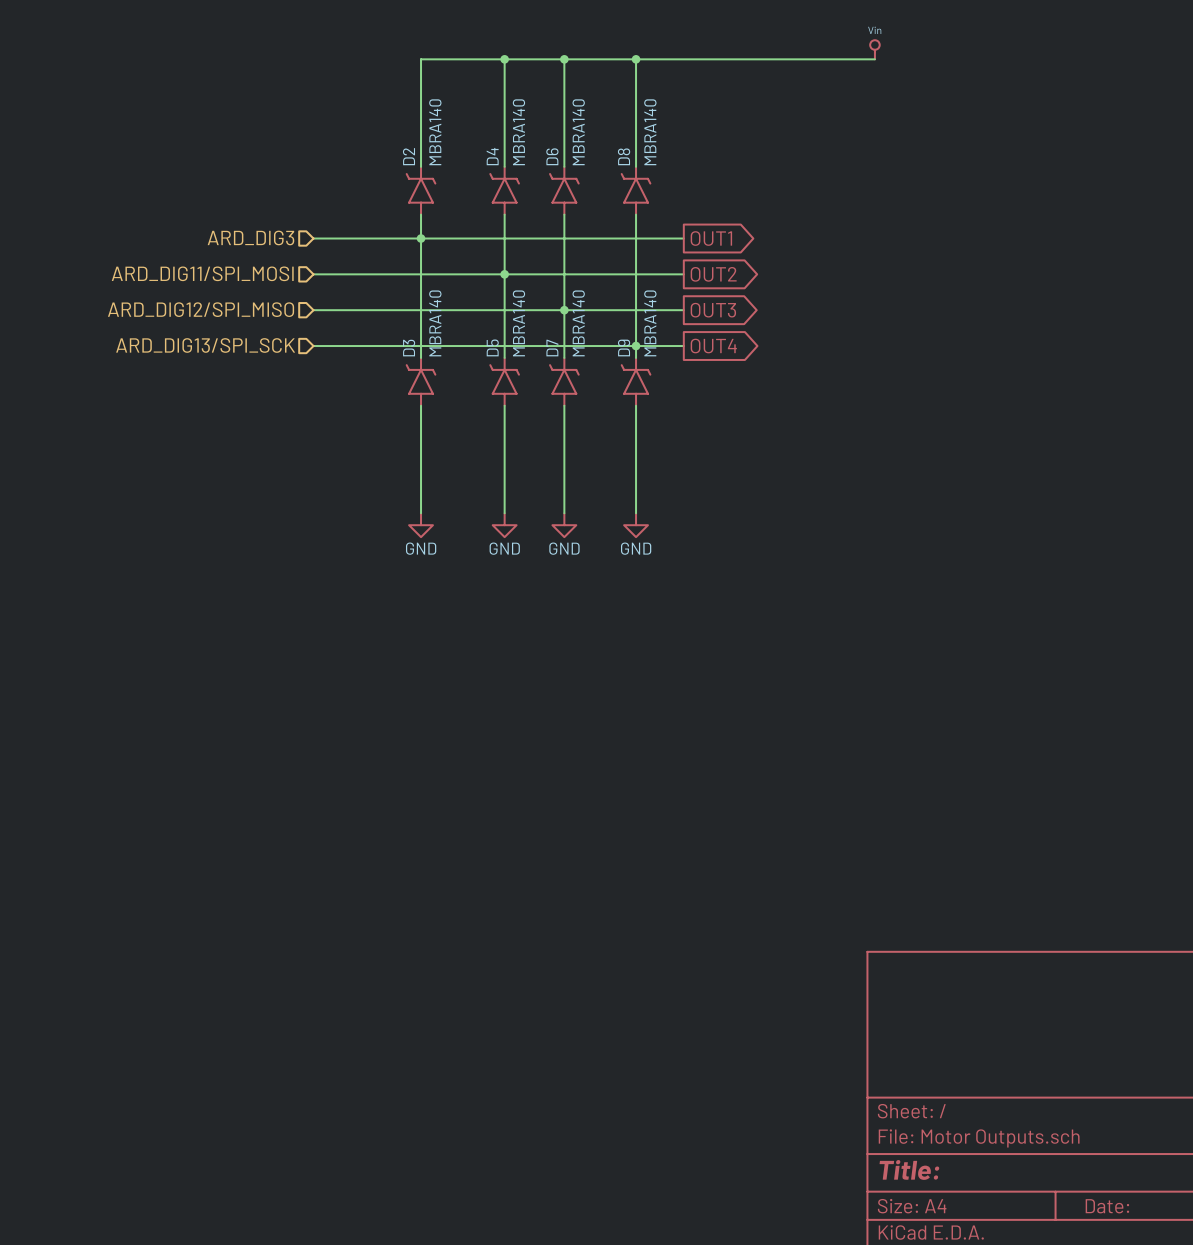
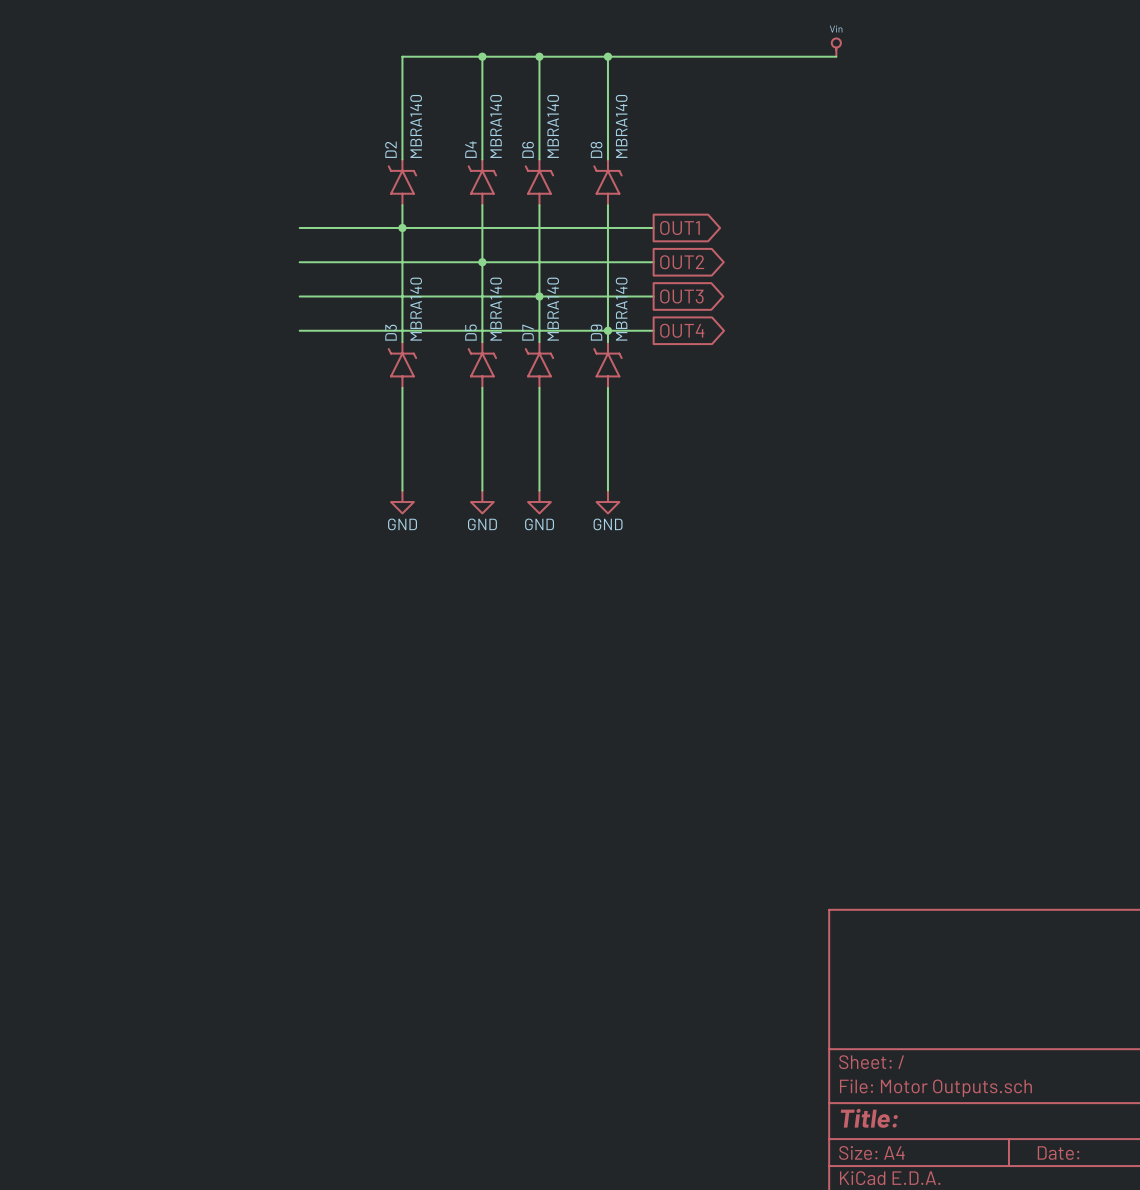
hierarchical label: ARD_DIG3 (250, 237) -> none
hierarchical label: ARD_DIG11/SPI_MOSI (202, 273) -> none
hierarchical label: ARD_DIG12/SPI_MISO (201, 309) -> none
hierarchical label: ARD_DIG13/SPI_SCK (205, 345) -> none

